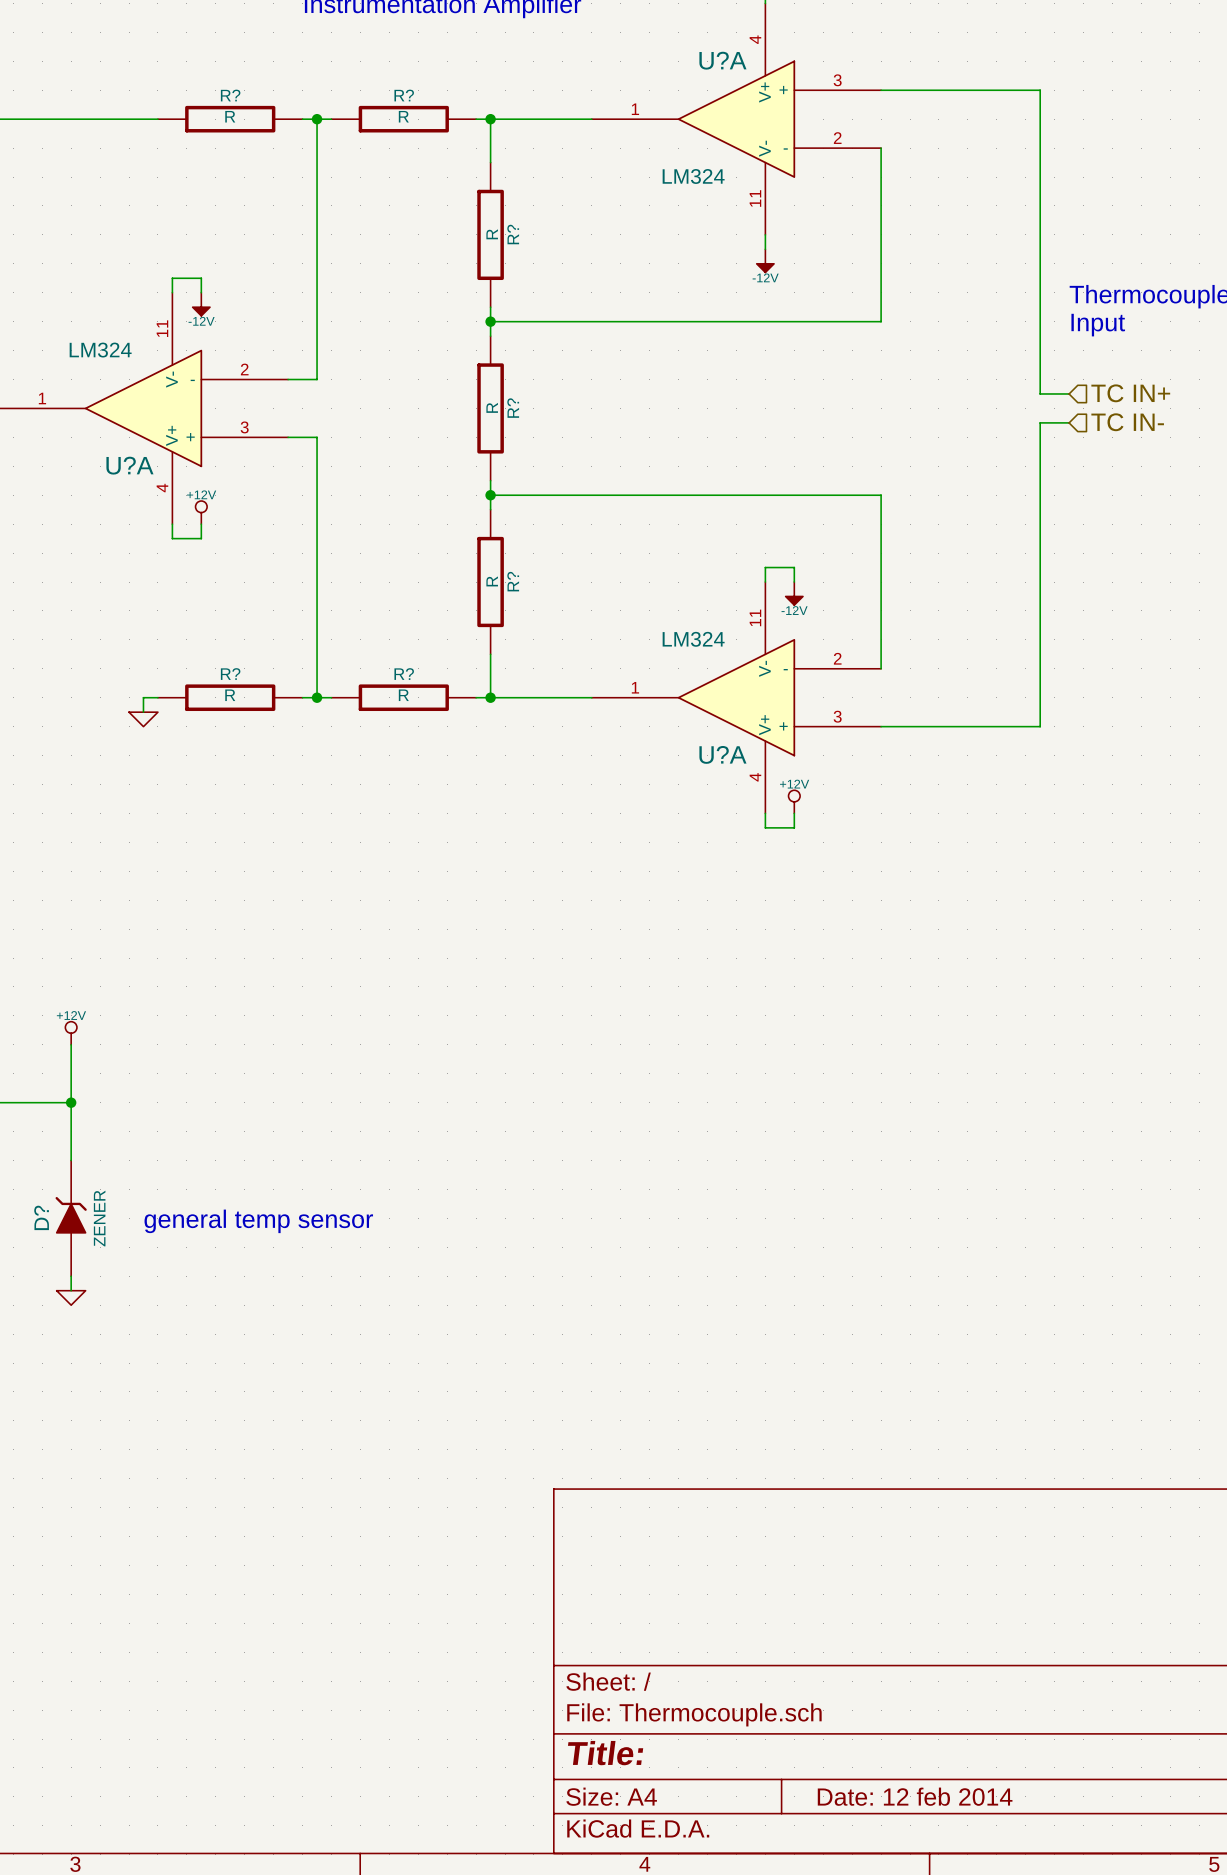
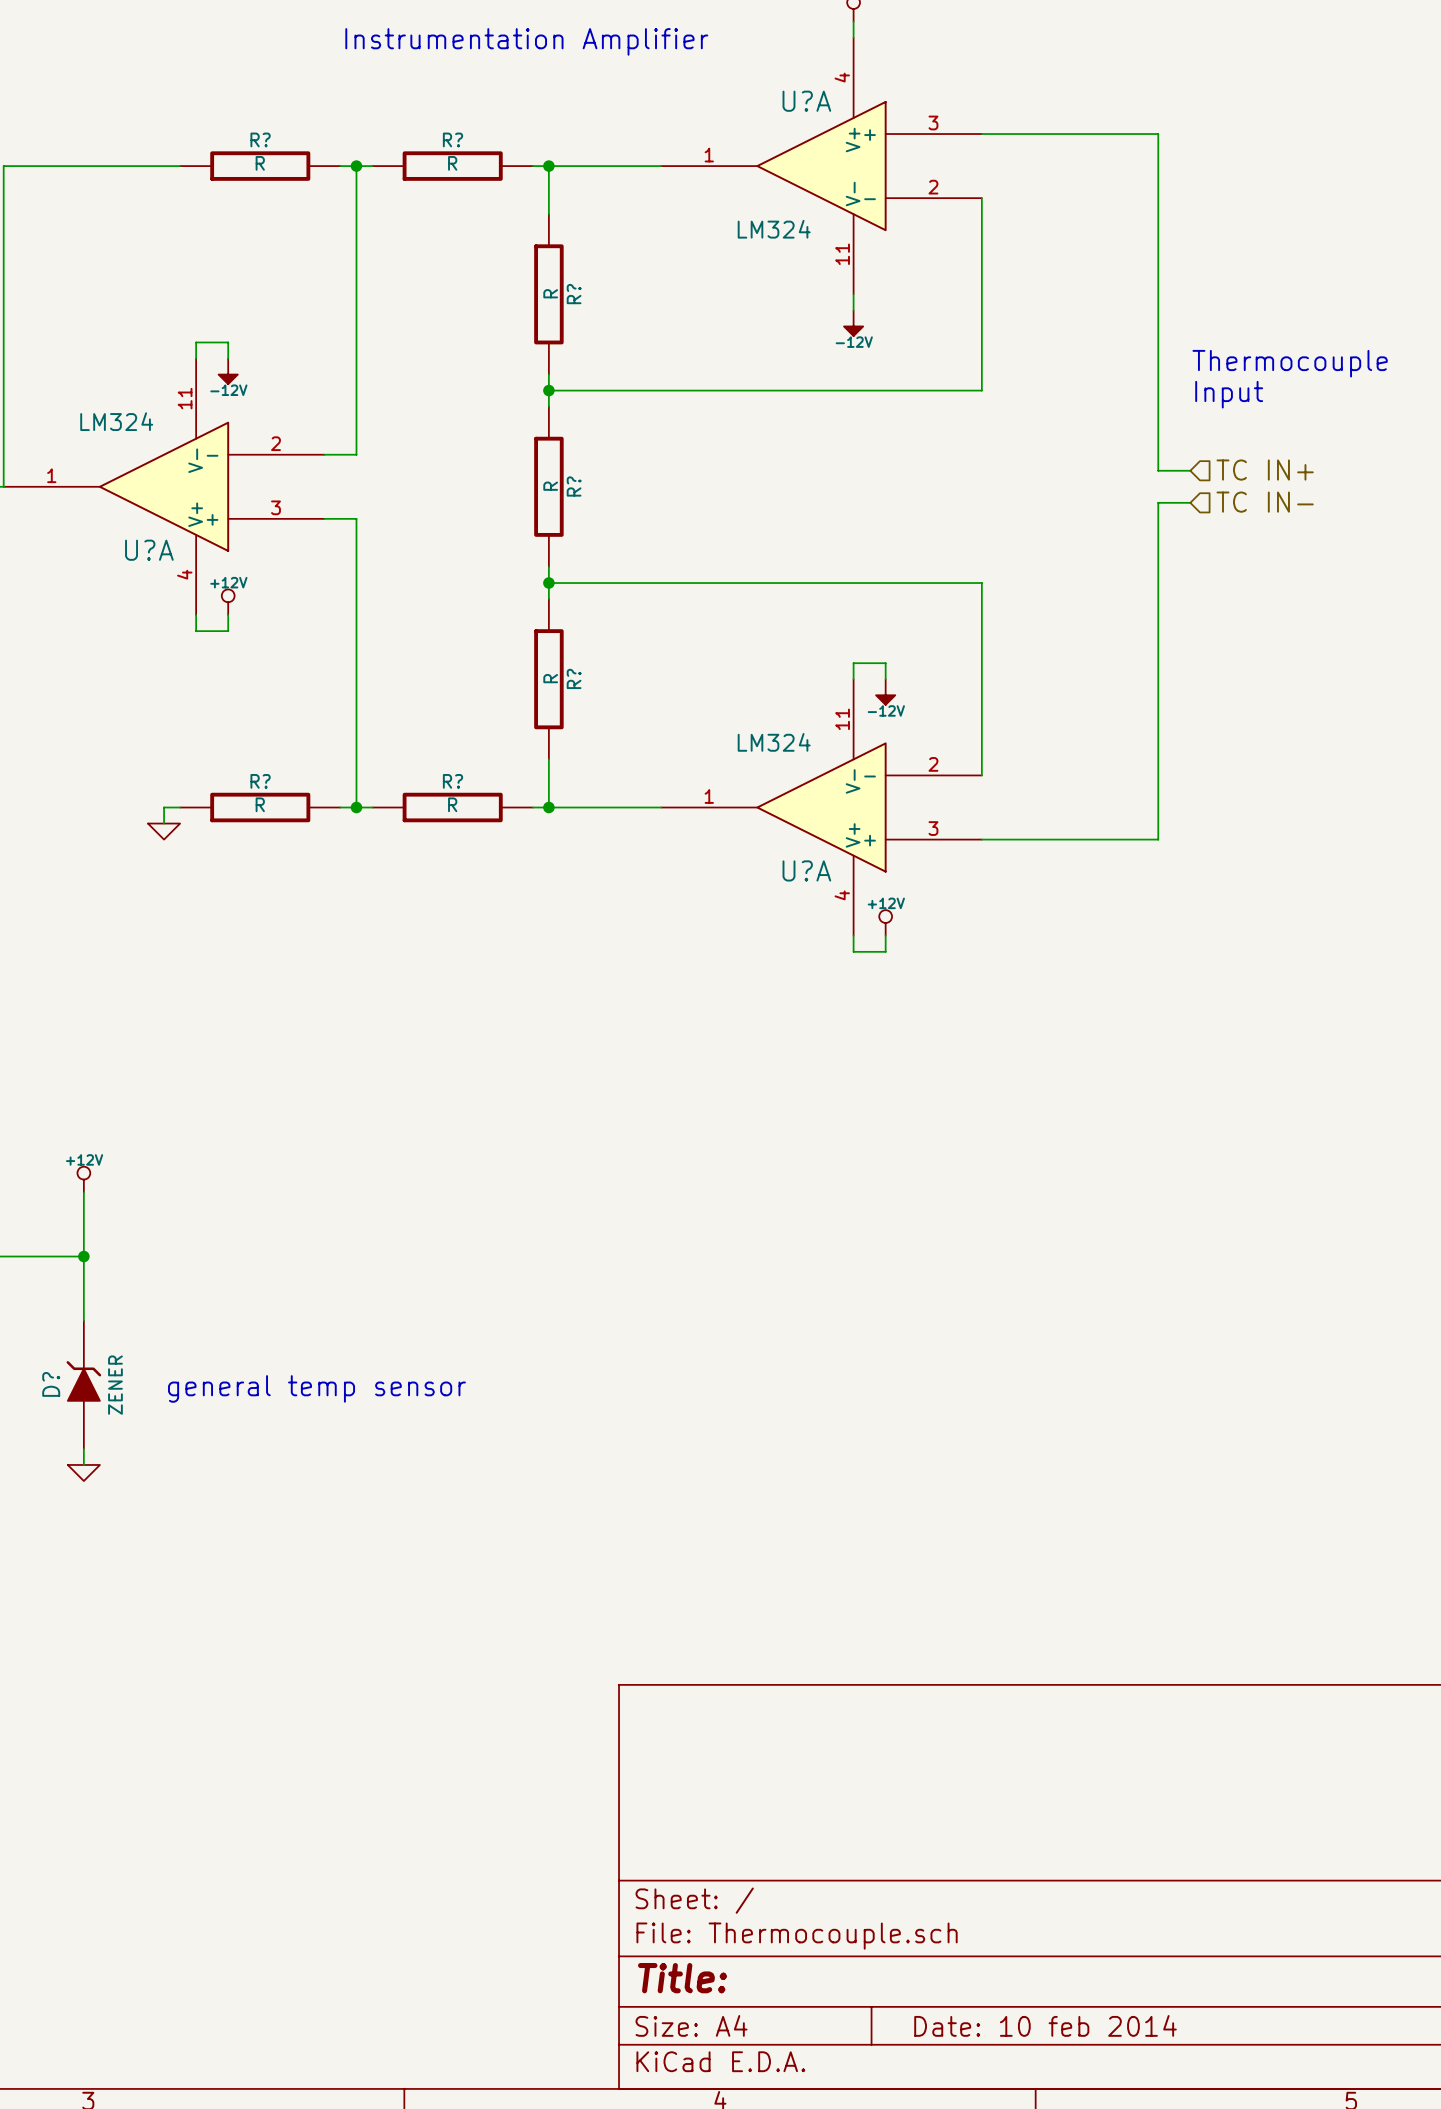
title block: Date: 12 feb 2014 (915, 1796) -> Date: 10 feb 2014 (1045, 2025)

